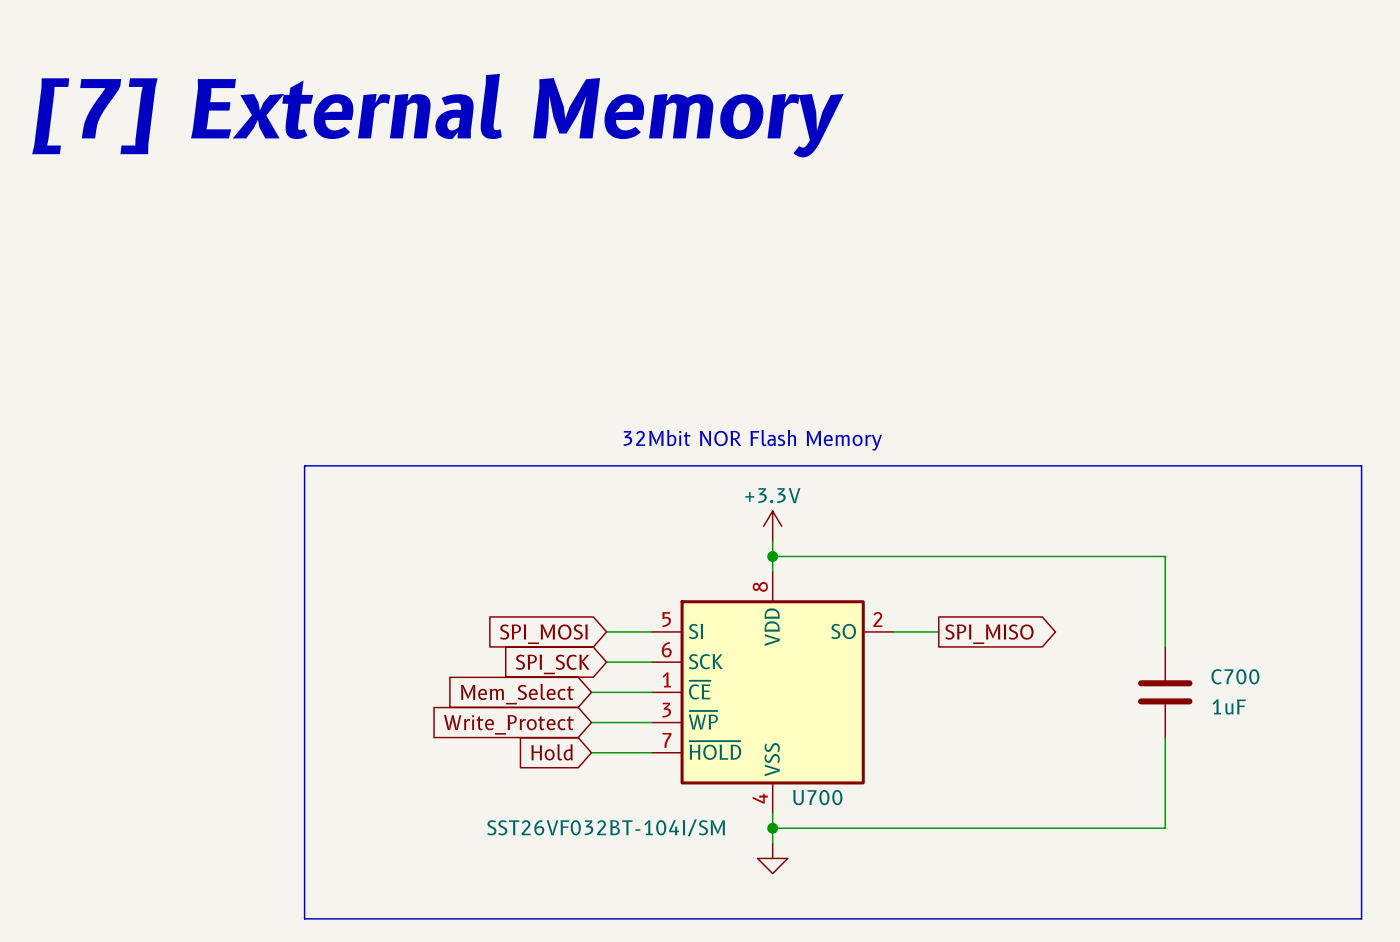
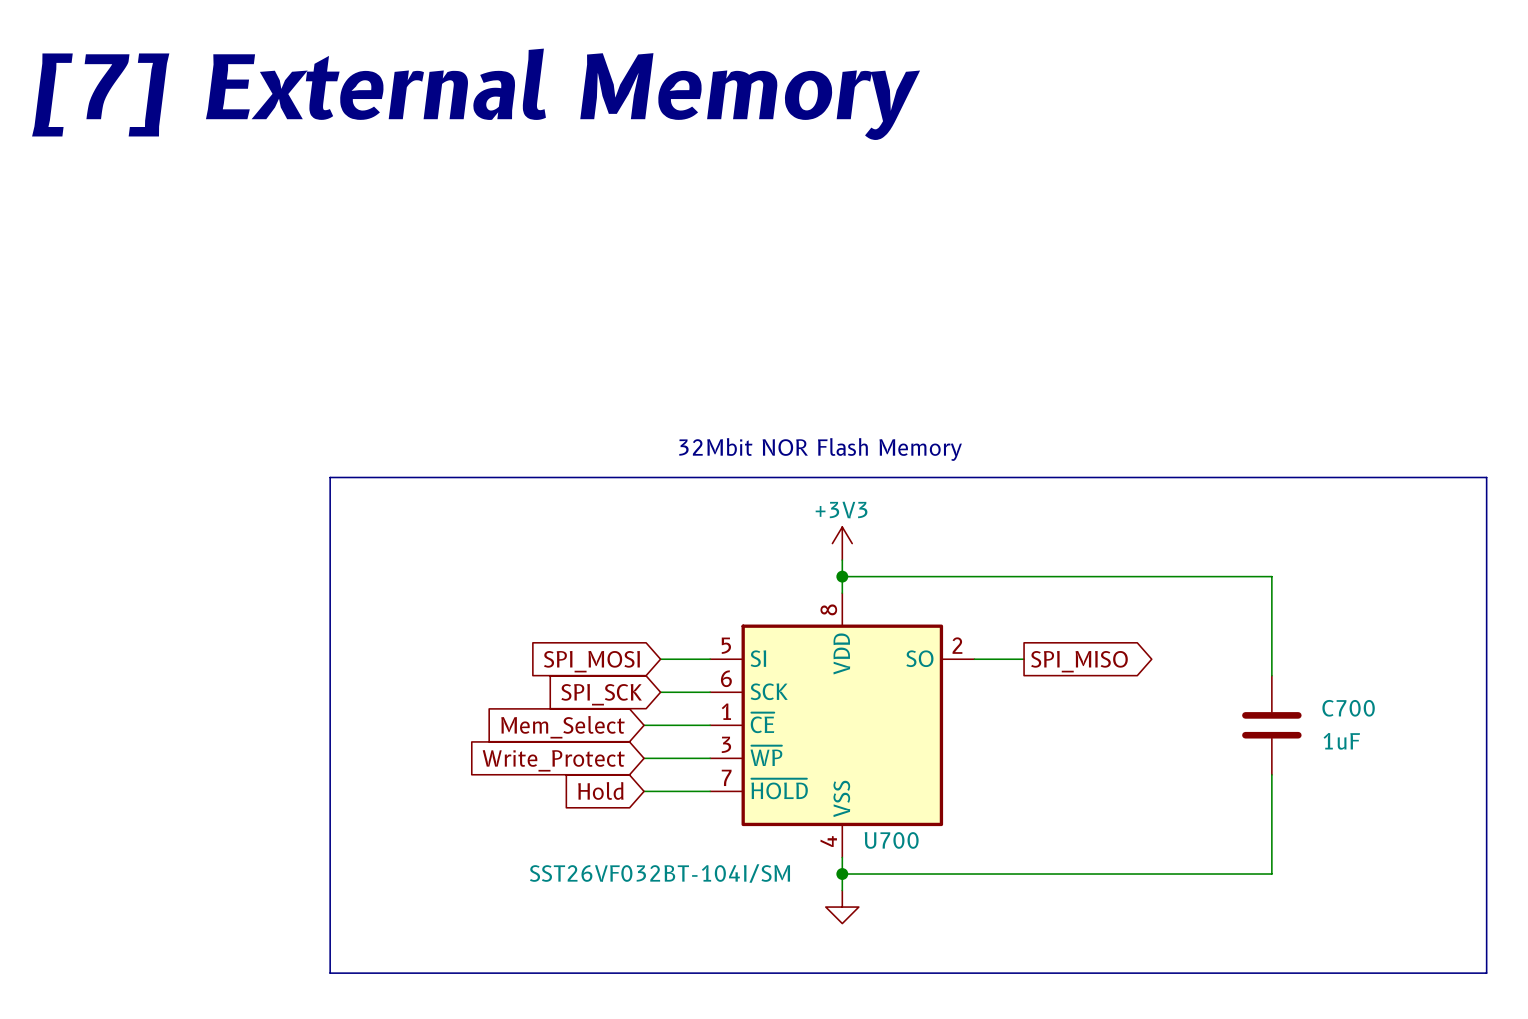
power symbol: +3.3V (772, 526) -> +3V3 (842, 543)

